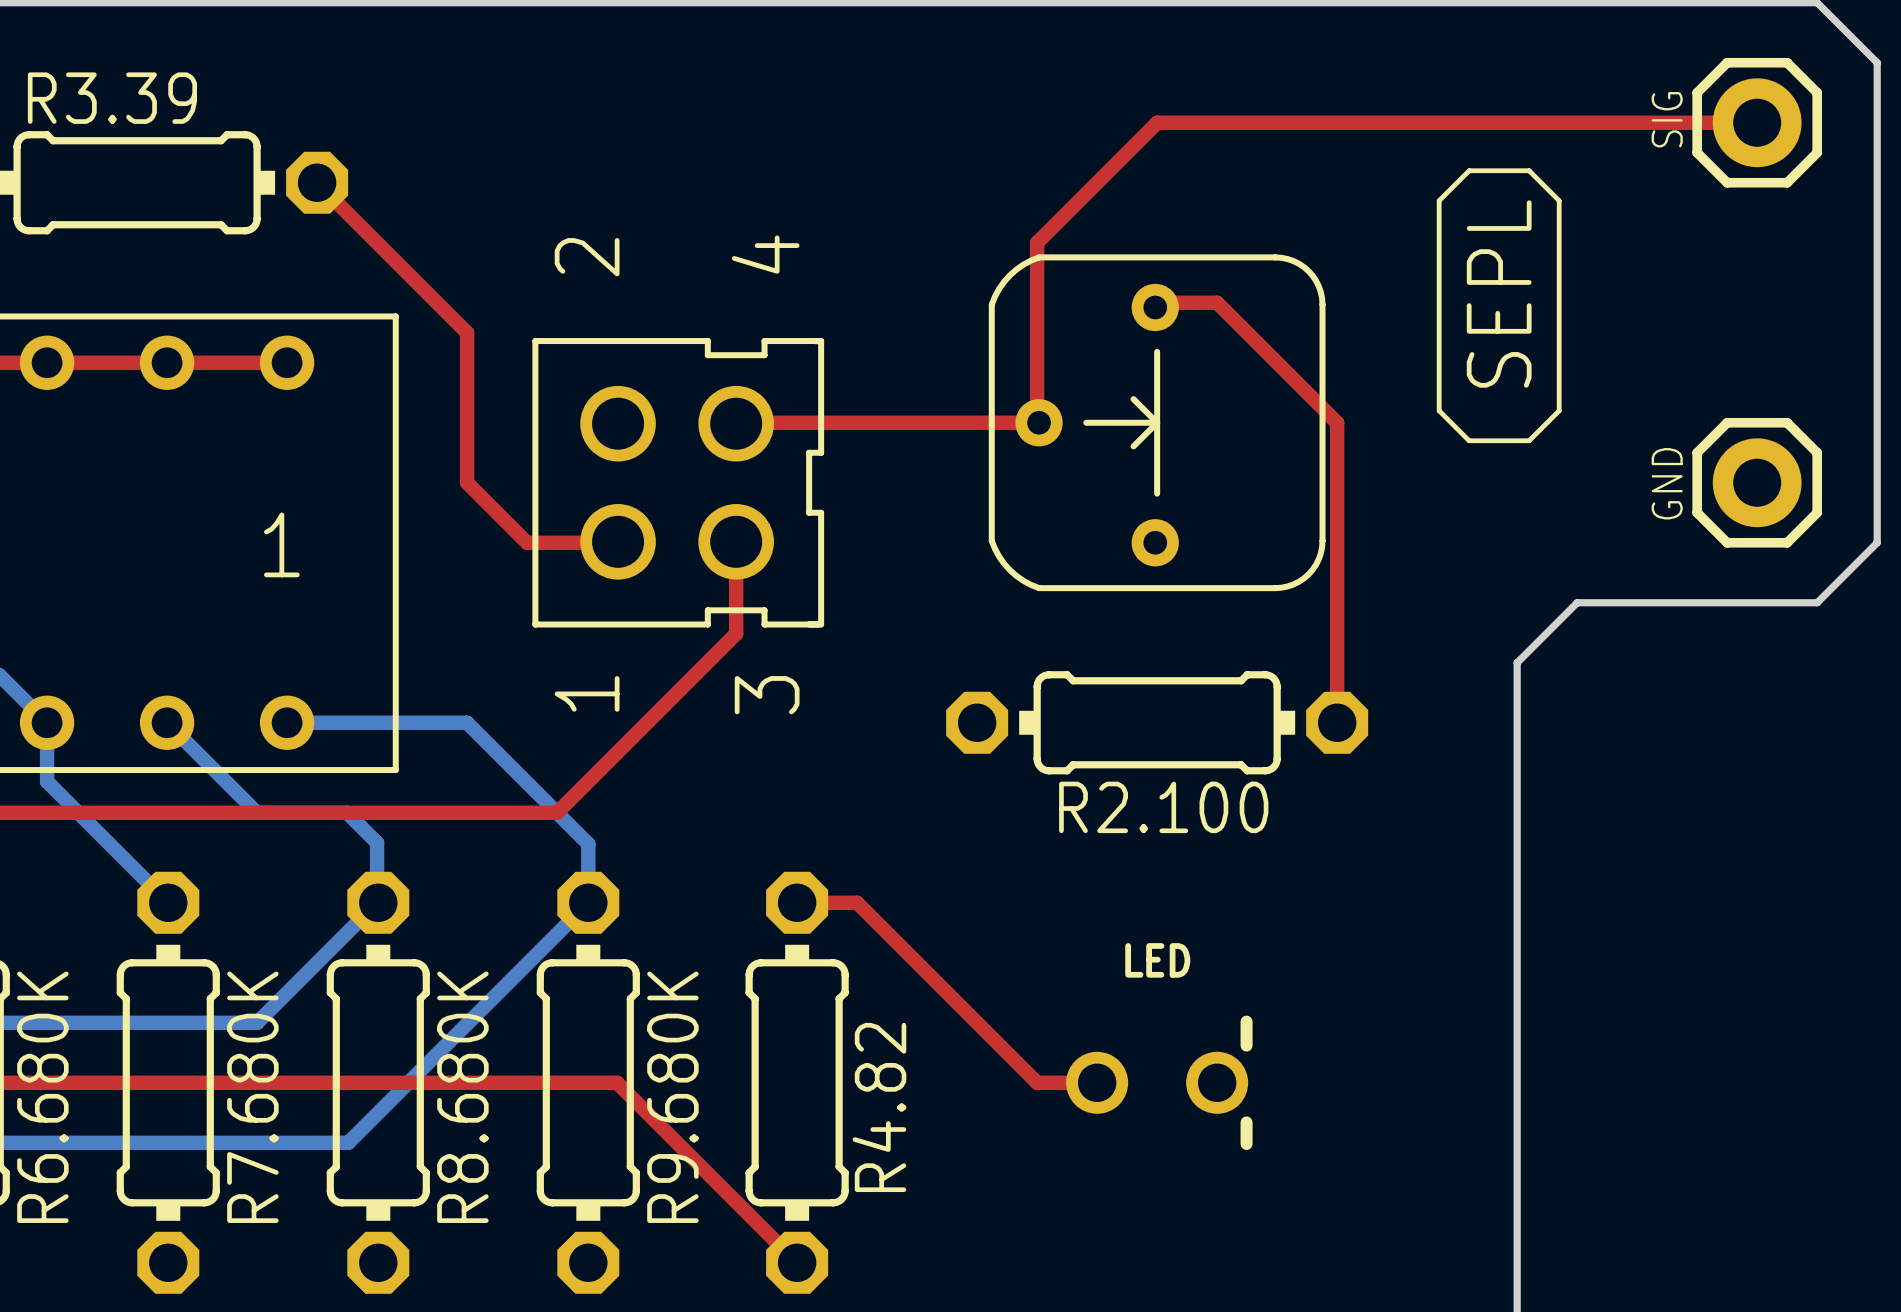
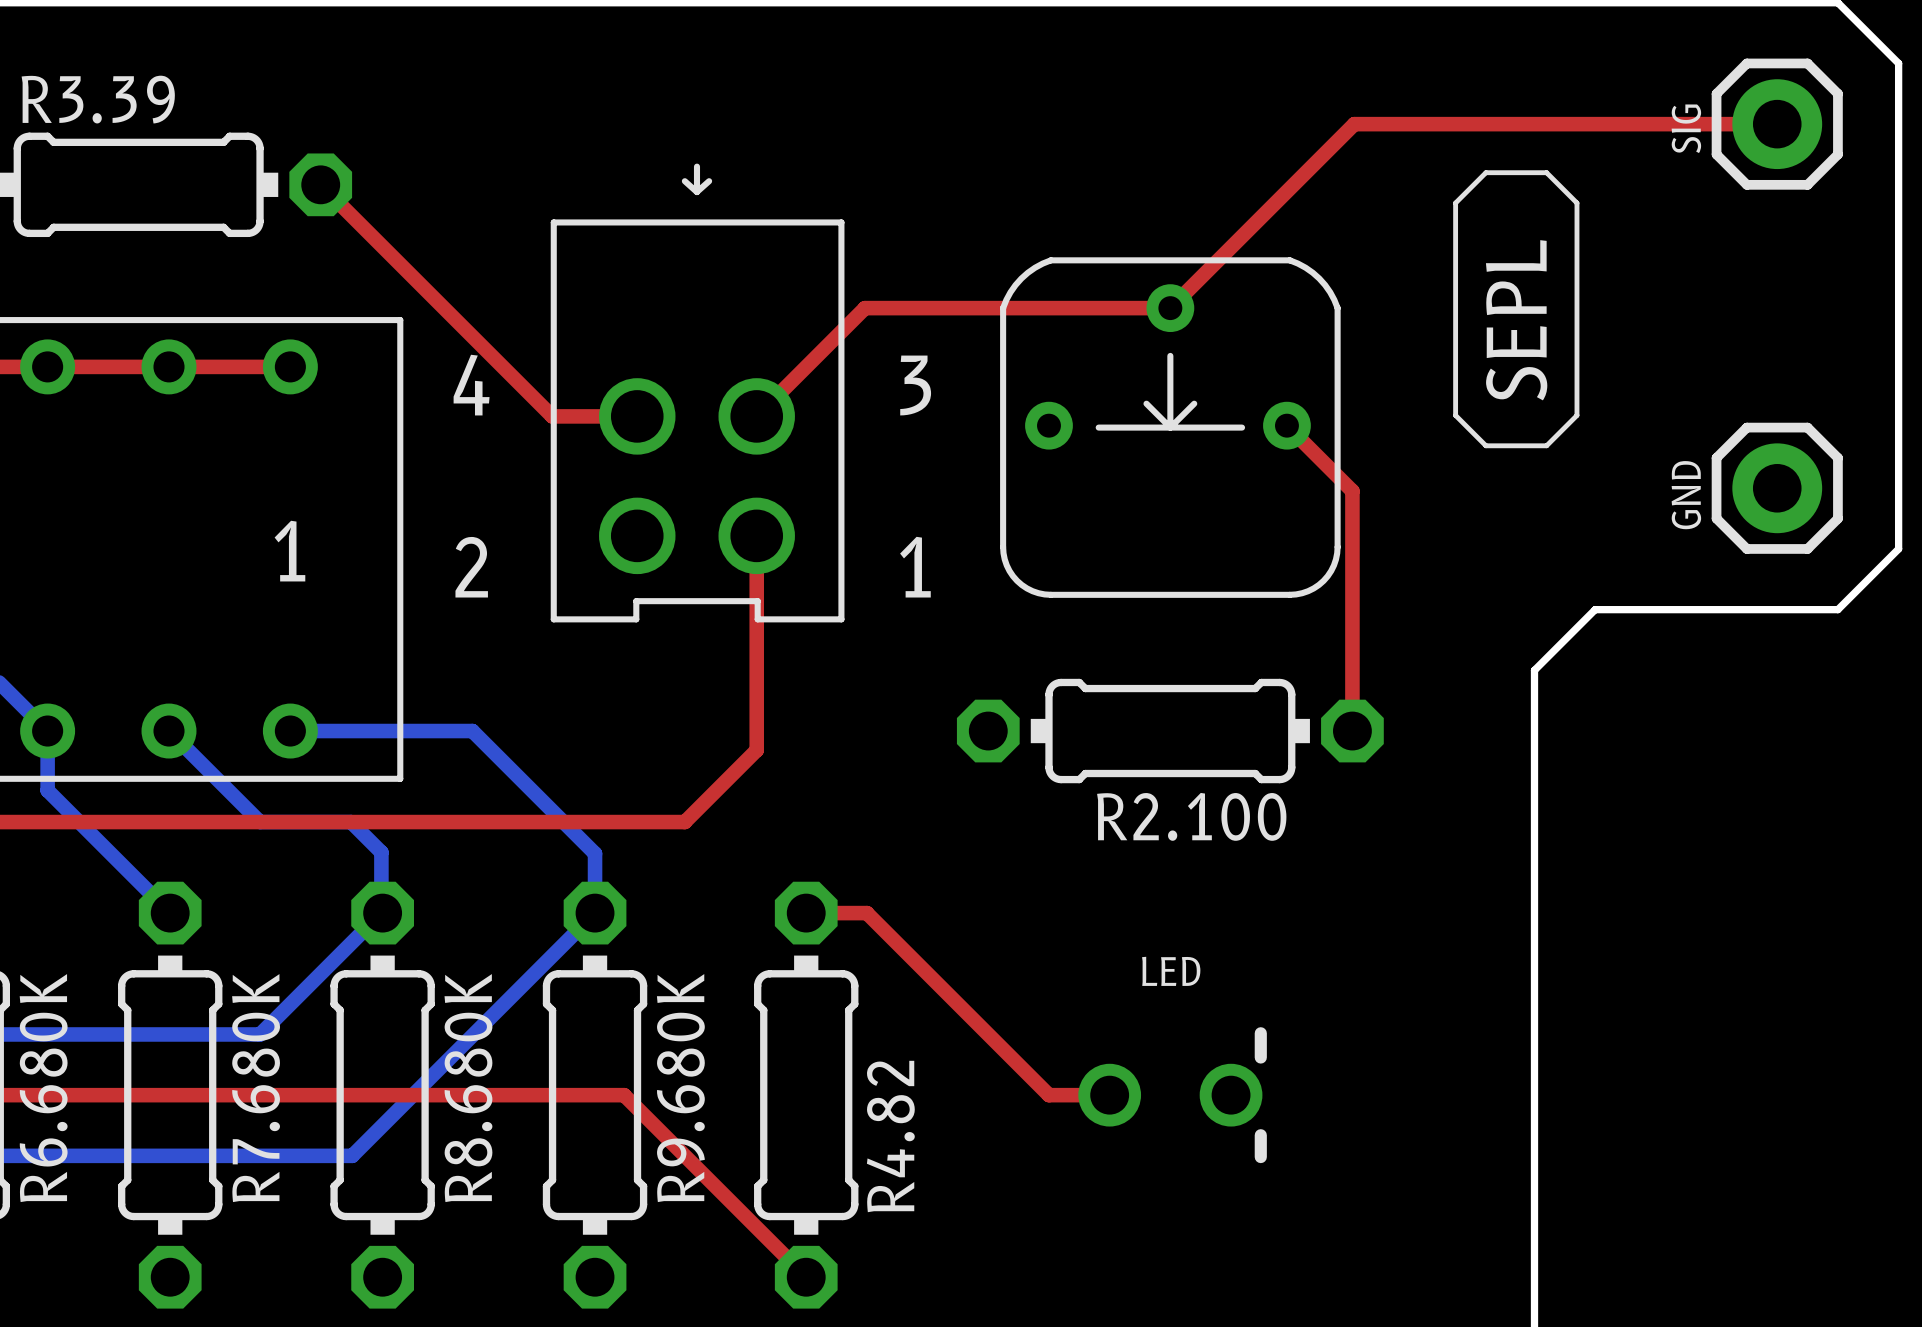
top track: (1339, 122) (1157, 122) (1037, 242) (1037, 420) (1039, 422) (736, 423) -> (1354, 124) (1170, 308) (865, 308) (756, 416)
top track: (1155, 307) (1159, 302) (1217, 302) (1337, 422) (1337, 485) -> (1286, 425) (1352, 491)
top track: (467, 332) (467, 482) (527, 542) (618, 541) -> (472, 336) (552, 416) (637, 416)
part: none -> (697, 392)
part rotation: 0° (1157, 422) -> 90° clockwise (1170, 427)
part: (678, 482) -> none
top track: (736, 541) (736, 633) (557, 812) -> (756, 535) (756, 750) (684, 822) (563, 822)

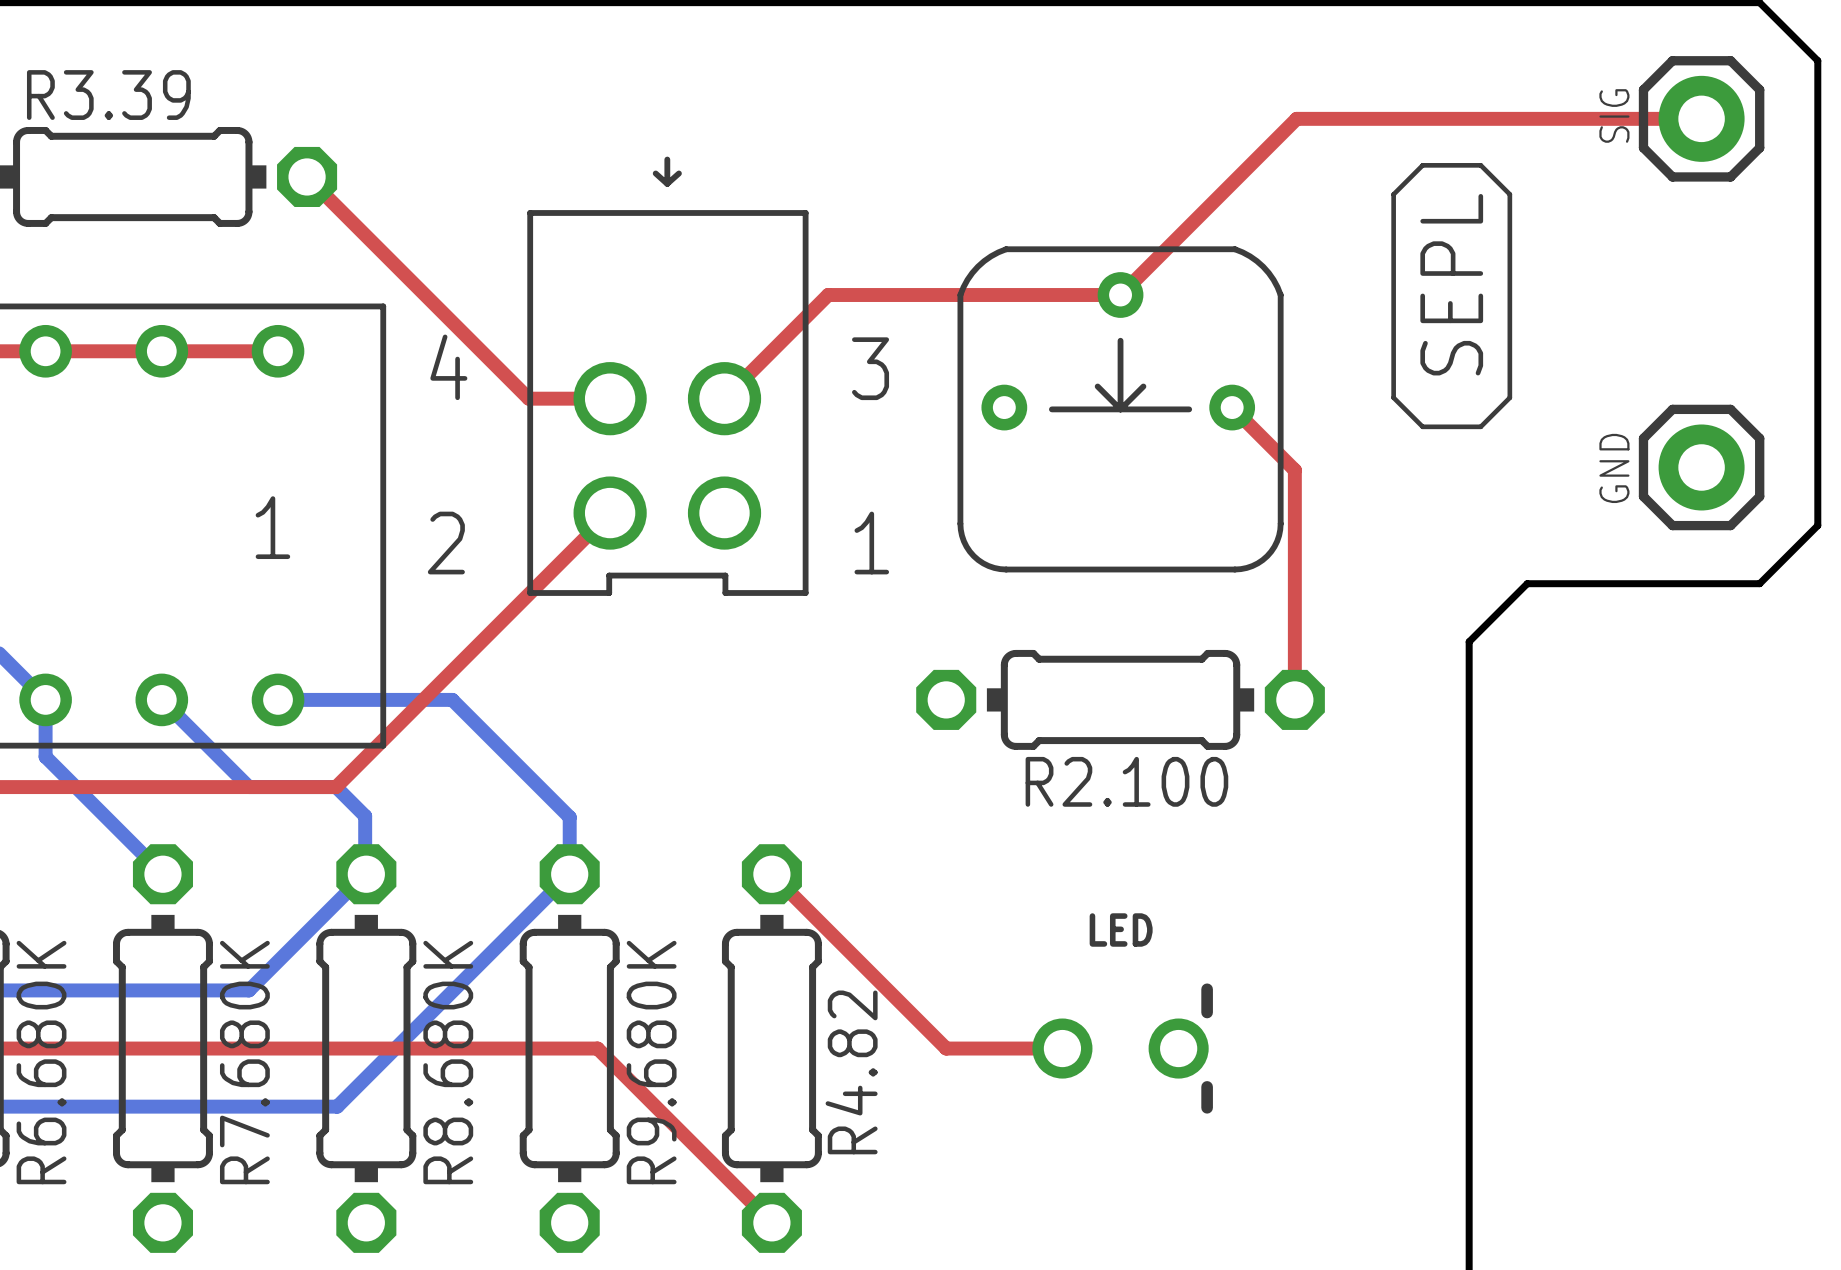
top track: (756, 535) (756, 750) (684, 822) (351, 822) -> (610, 513) (336, 787)
top track: (806, 913) (866, 913) (1048, 1095) -> (771, 874) (946, 1048) (1004, 1048)

